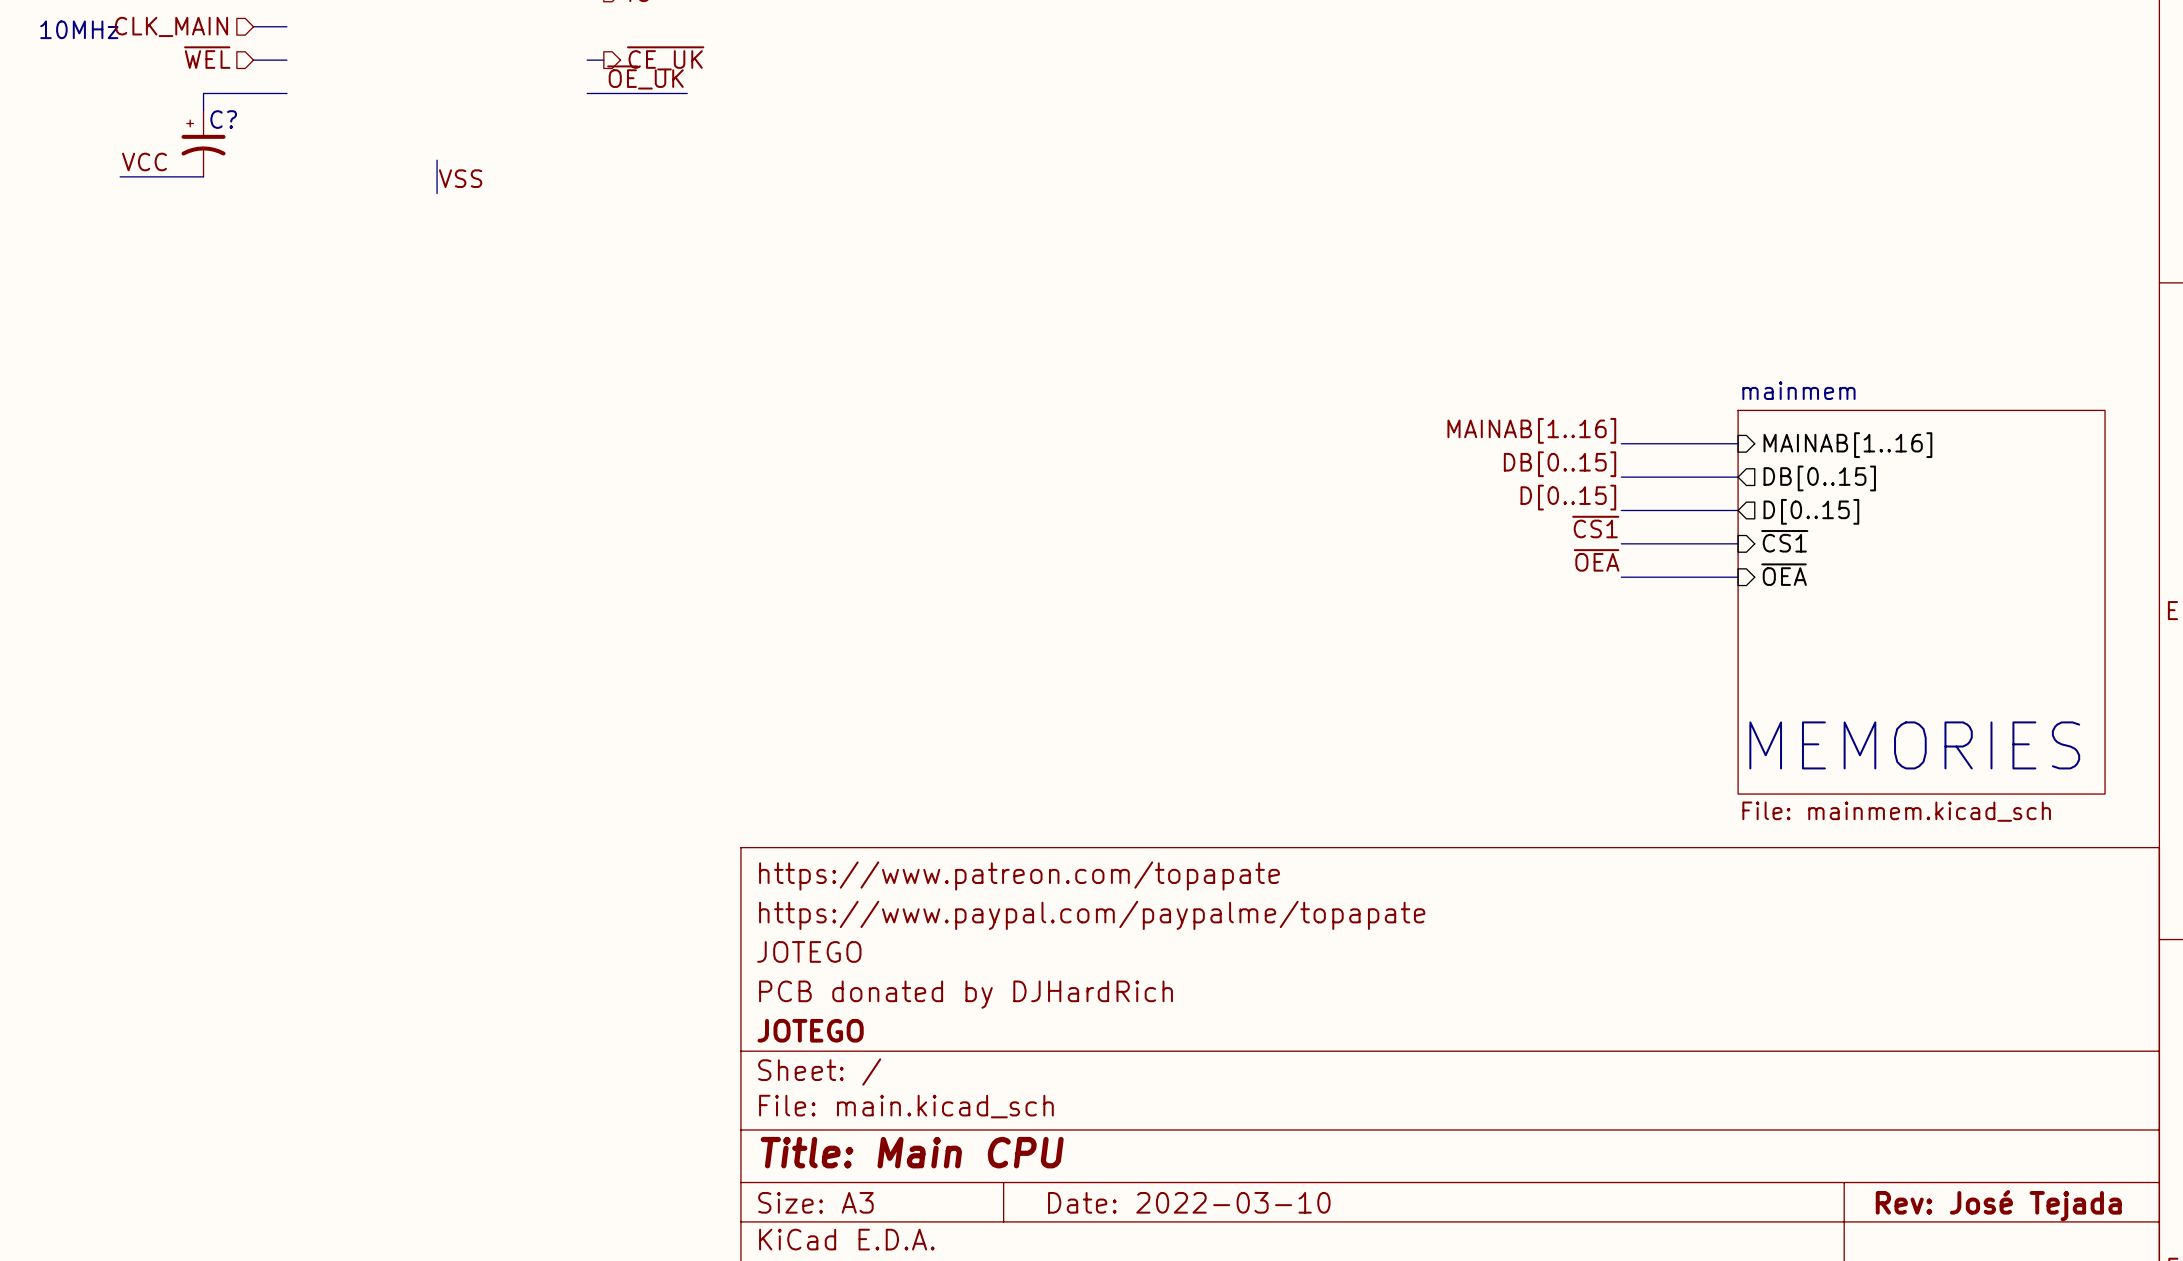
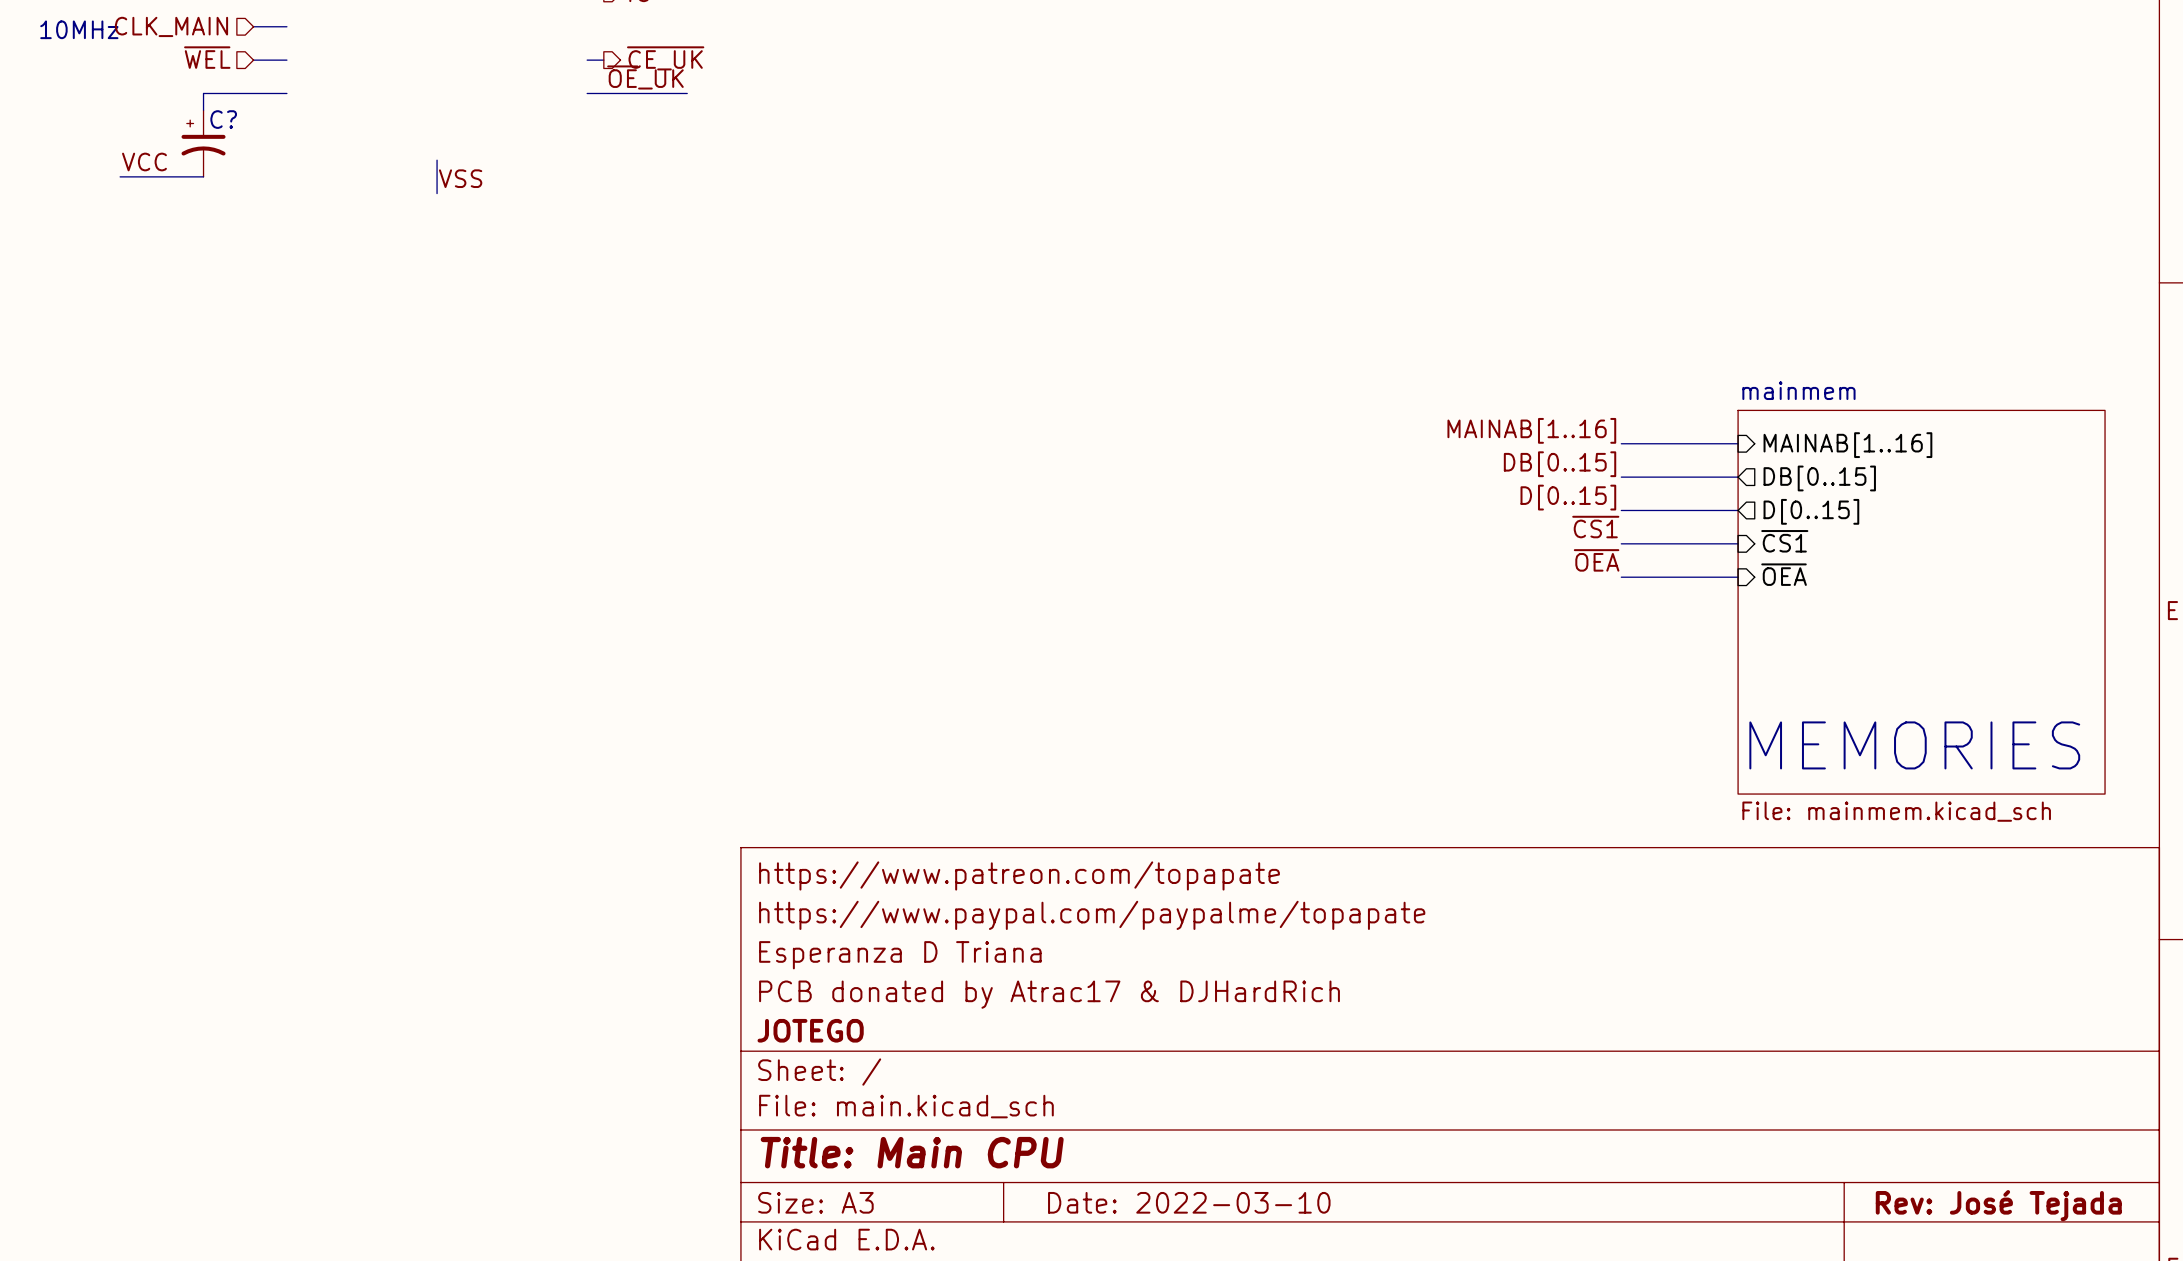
title block: JOTEGO (809, 951) -> Esperanza D Triana (900, 955)
title block: PCB donated by DJHardRich (966, 994) -> PCB donated by Atrac17 & DJHardRich (1049, 994)

